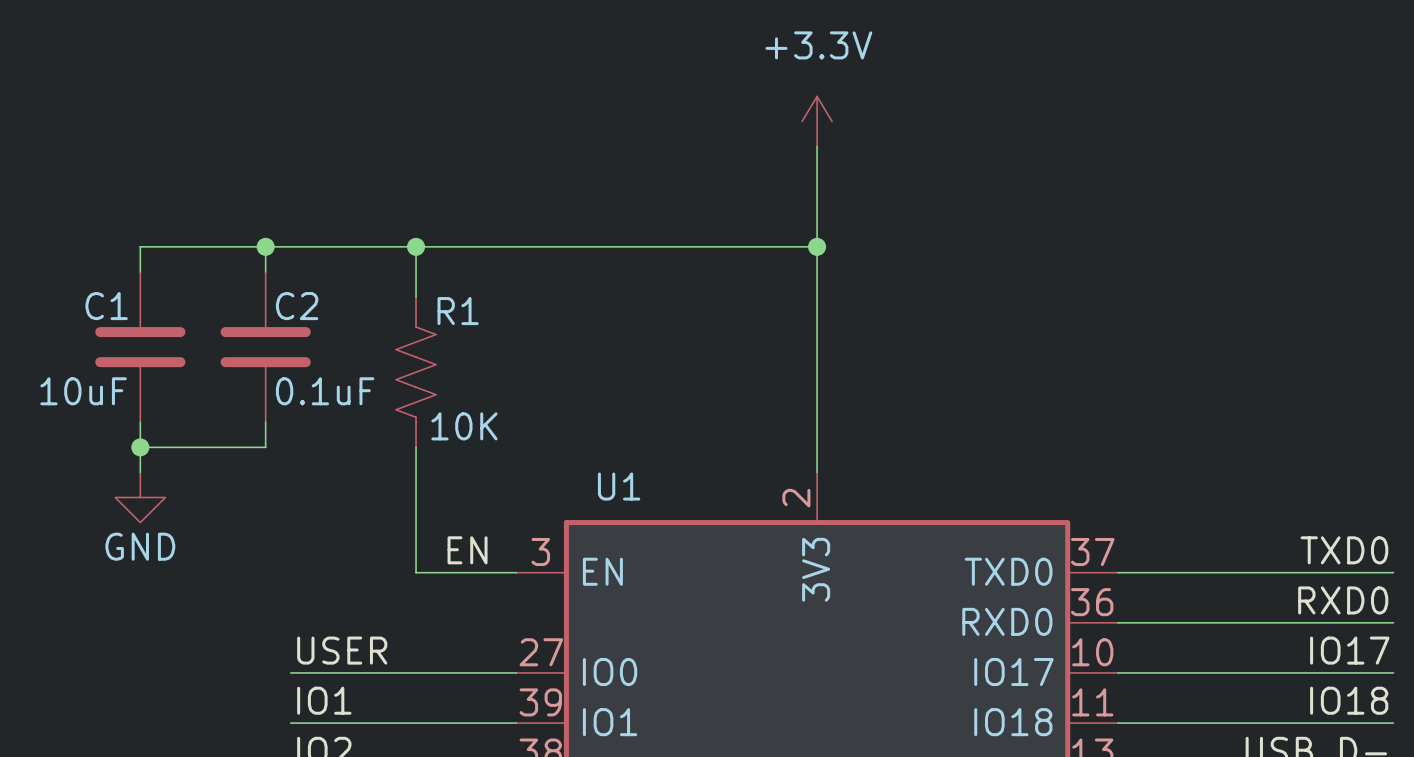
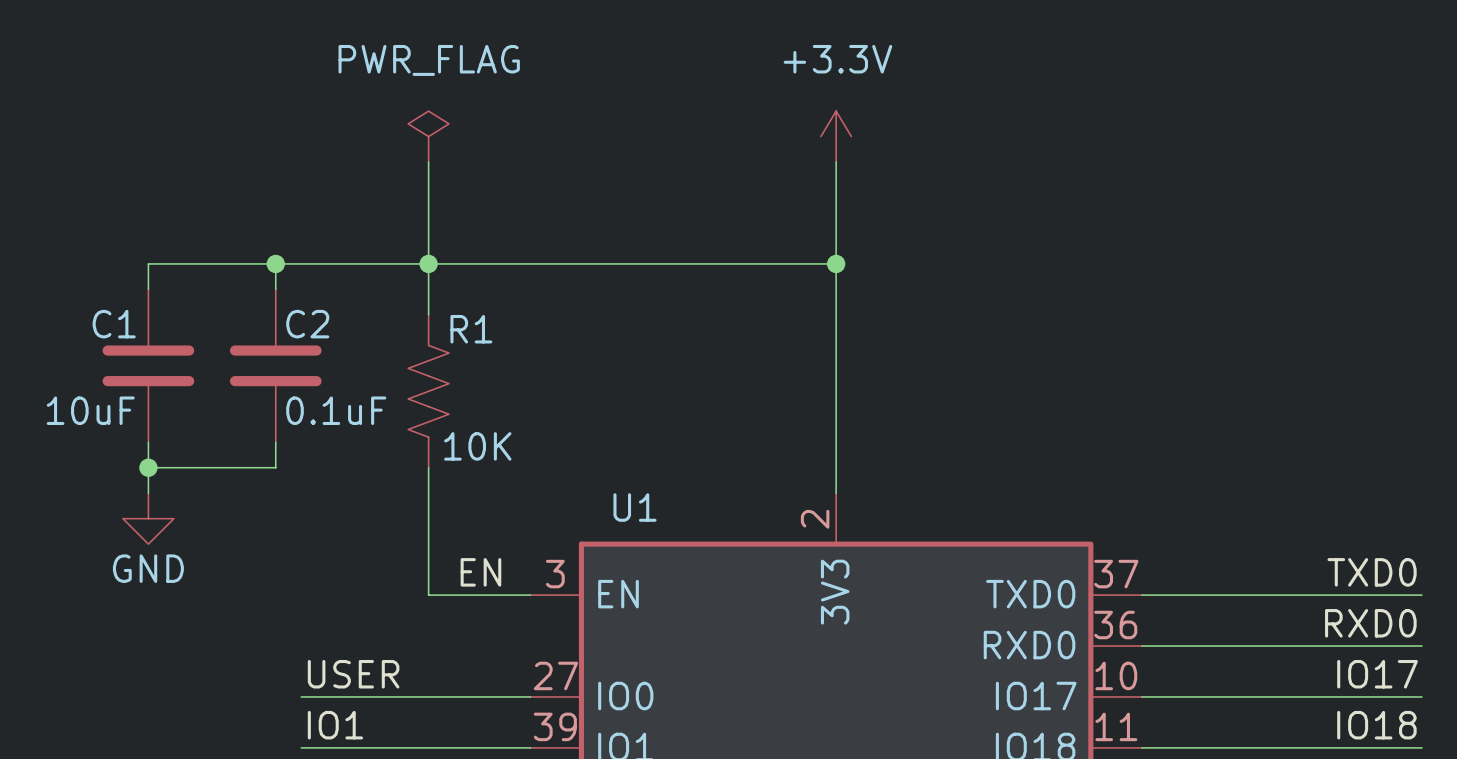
power symbol: none -> PWR_FLAG (428, 136)
wire: none -> (428, 162) (428, 263)

